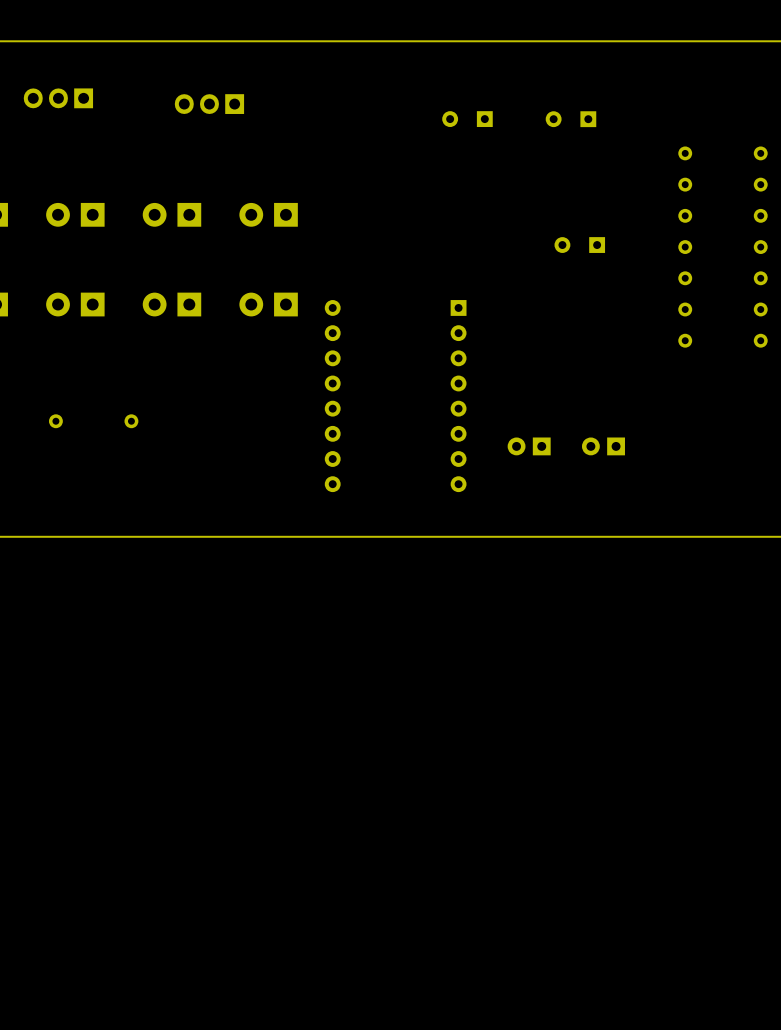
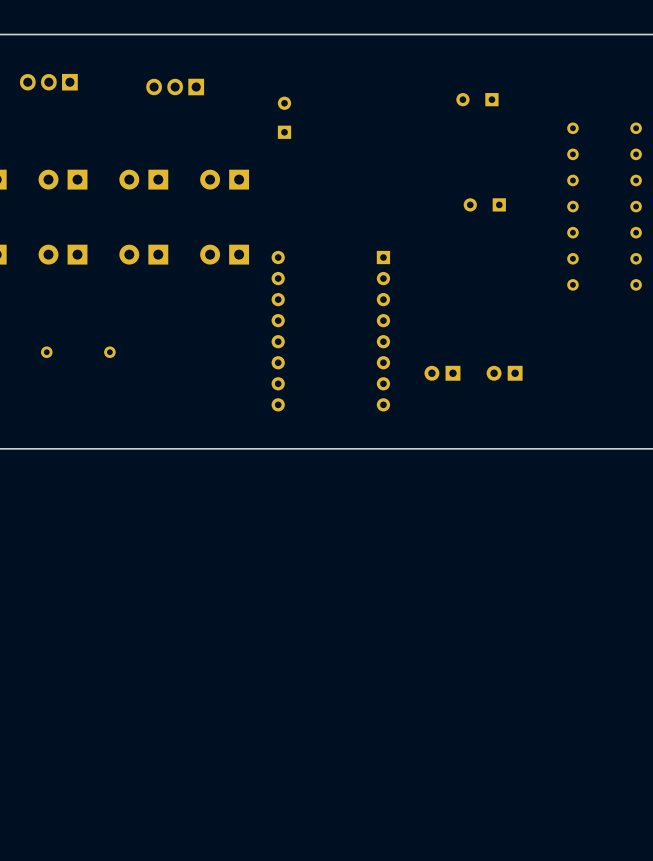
part rotation: 0° (467, 119) -> 90° clockwise (284, 117)
part position: (467, 119) -> (284, 117)

